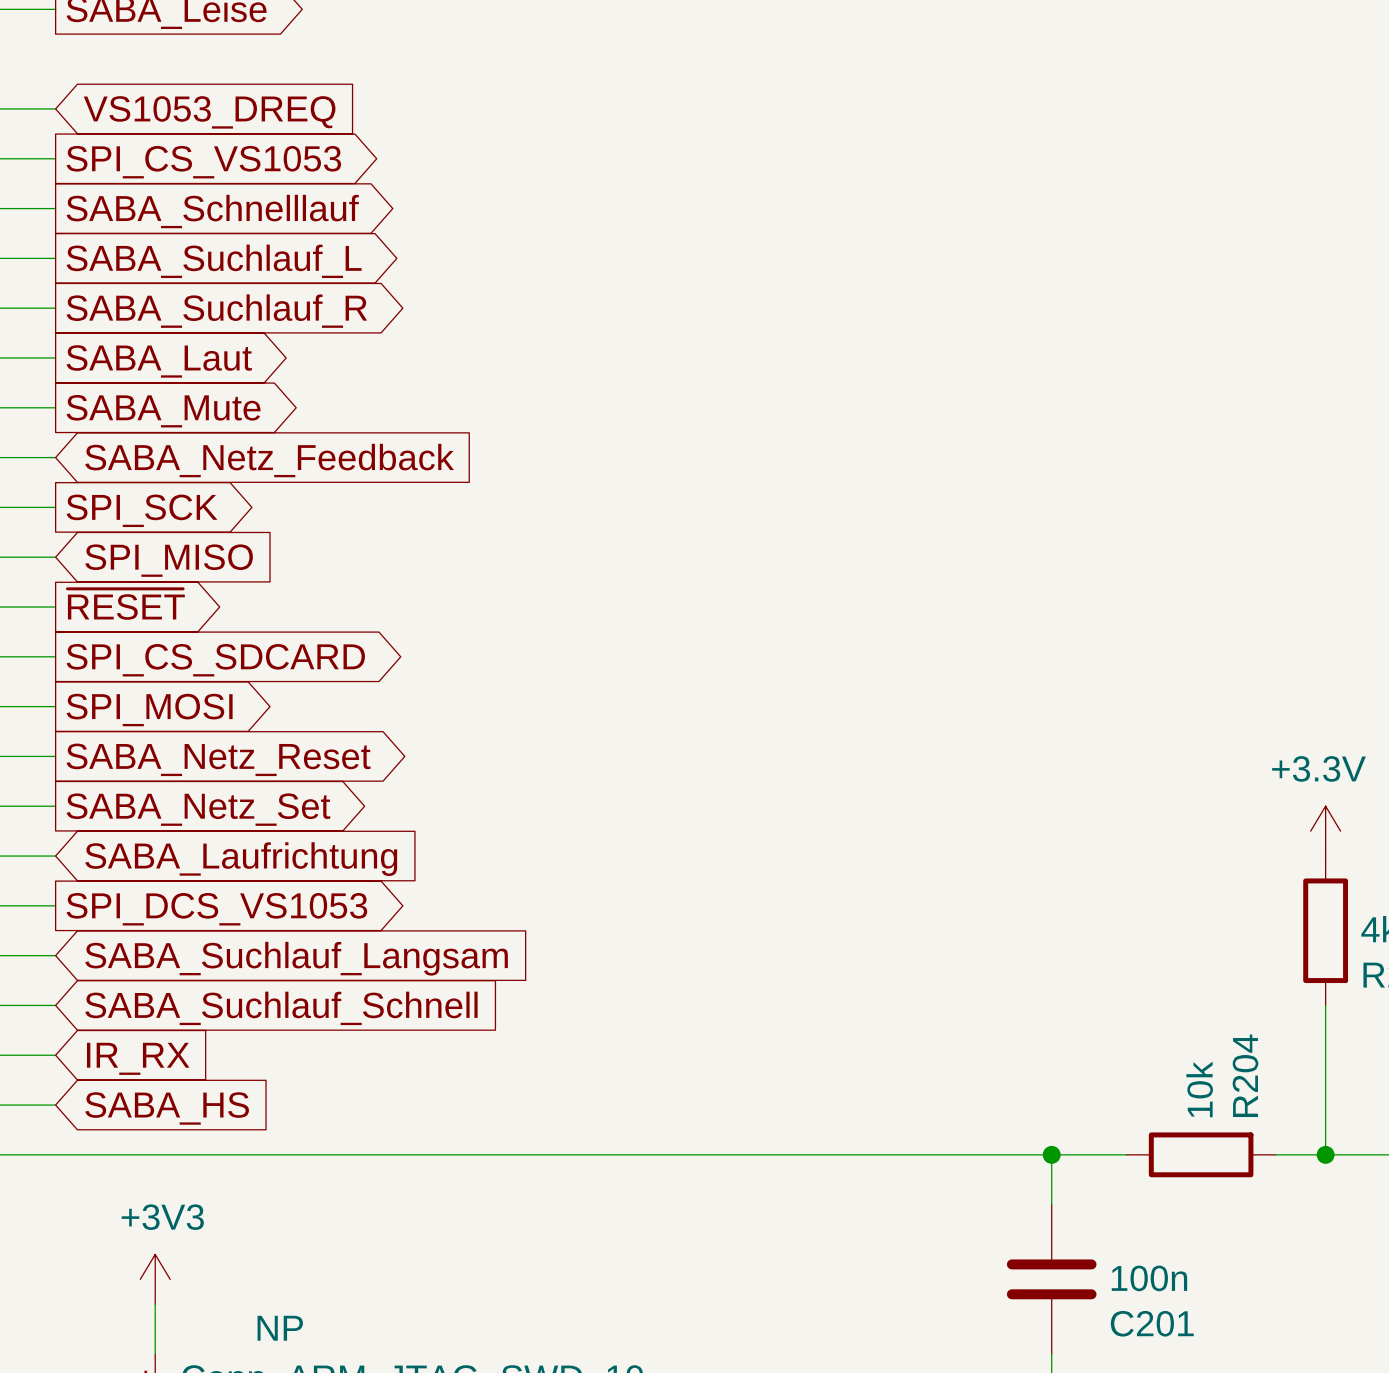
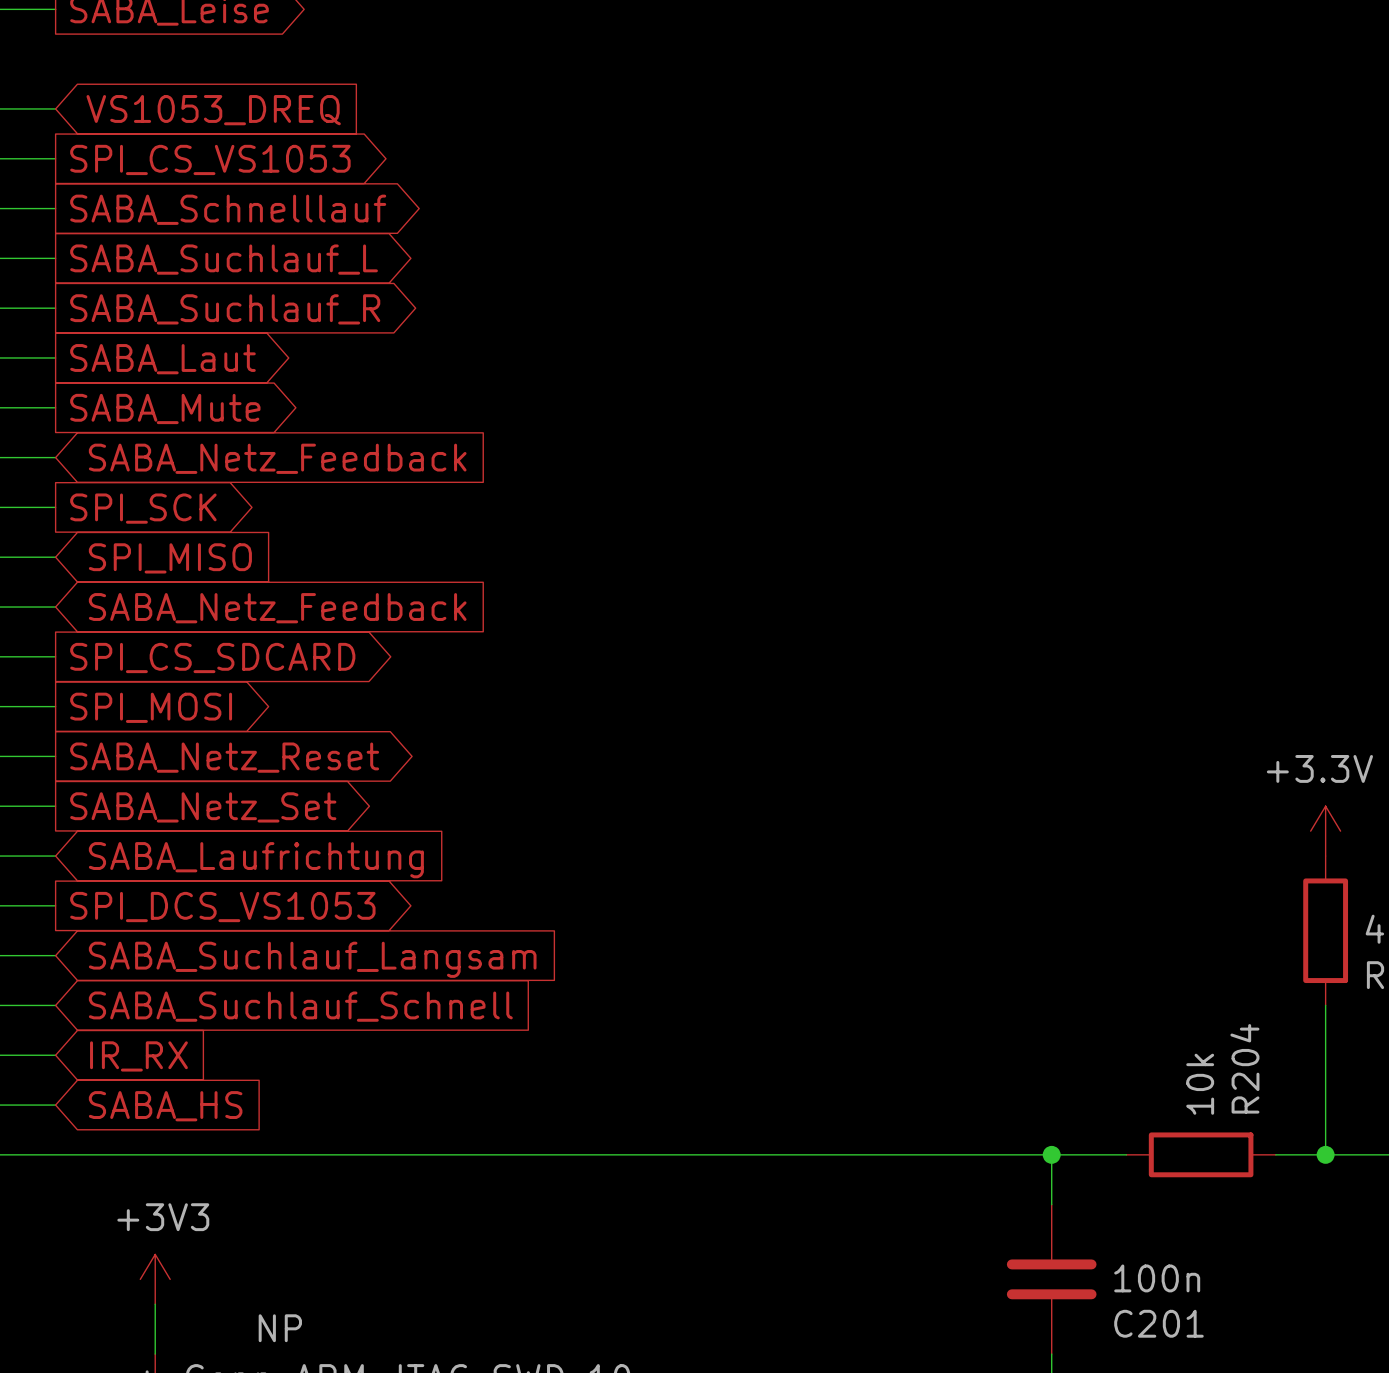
global label shape: output (126, 604) -> input (277, 608)
global label: ~{RESET} (126, 604) -> SABA_Netz_Feedback (277, 608)

